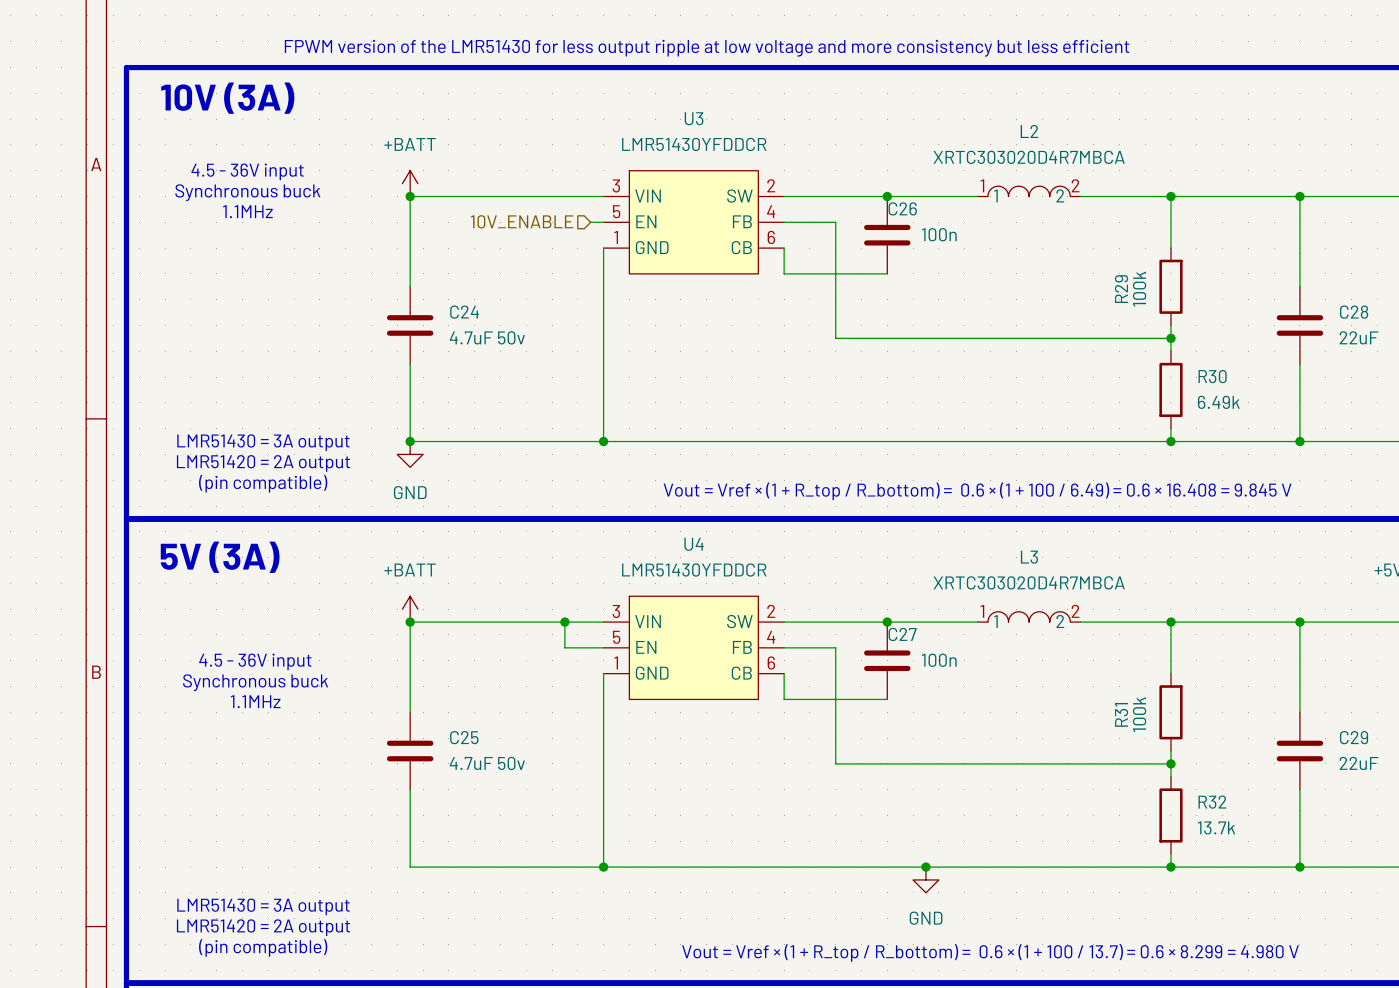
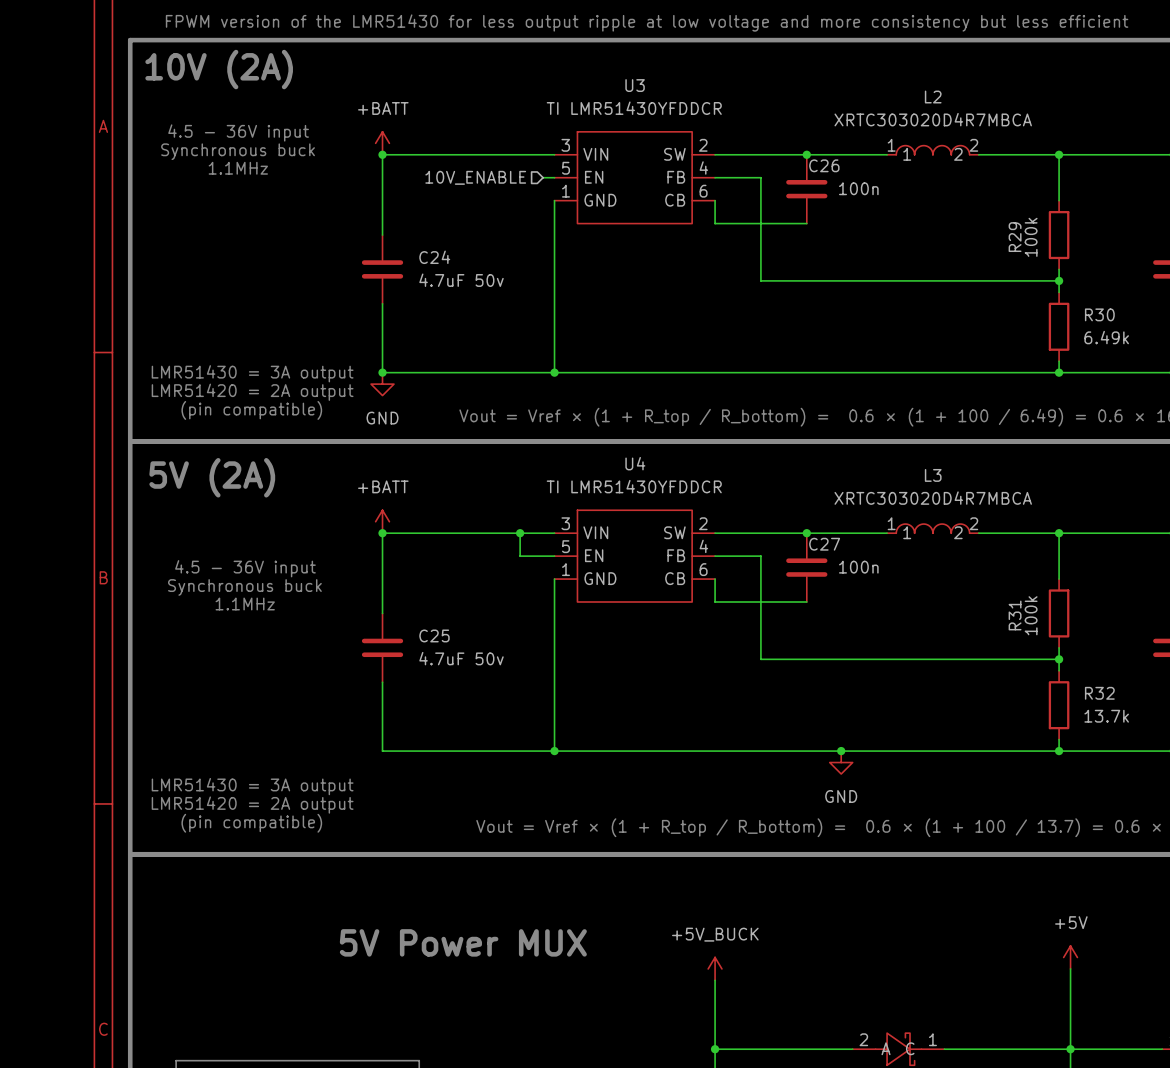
text: 10V (3A) (227, 98) -> 10V (2A) (219, 69)
U3 value: LMR51430YFDDCR (694, 144) -> TI LMR51430YFDDCR (634, 108)
text: 5V (3A) (220, 557) -> 5V (2A) (212, 477)
U4 value: LMR51430YFDDCR (694, 570) -> TI LMR51430YFDDCR (634, 486)

